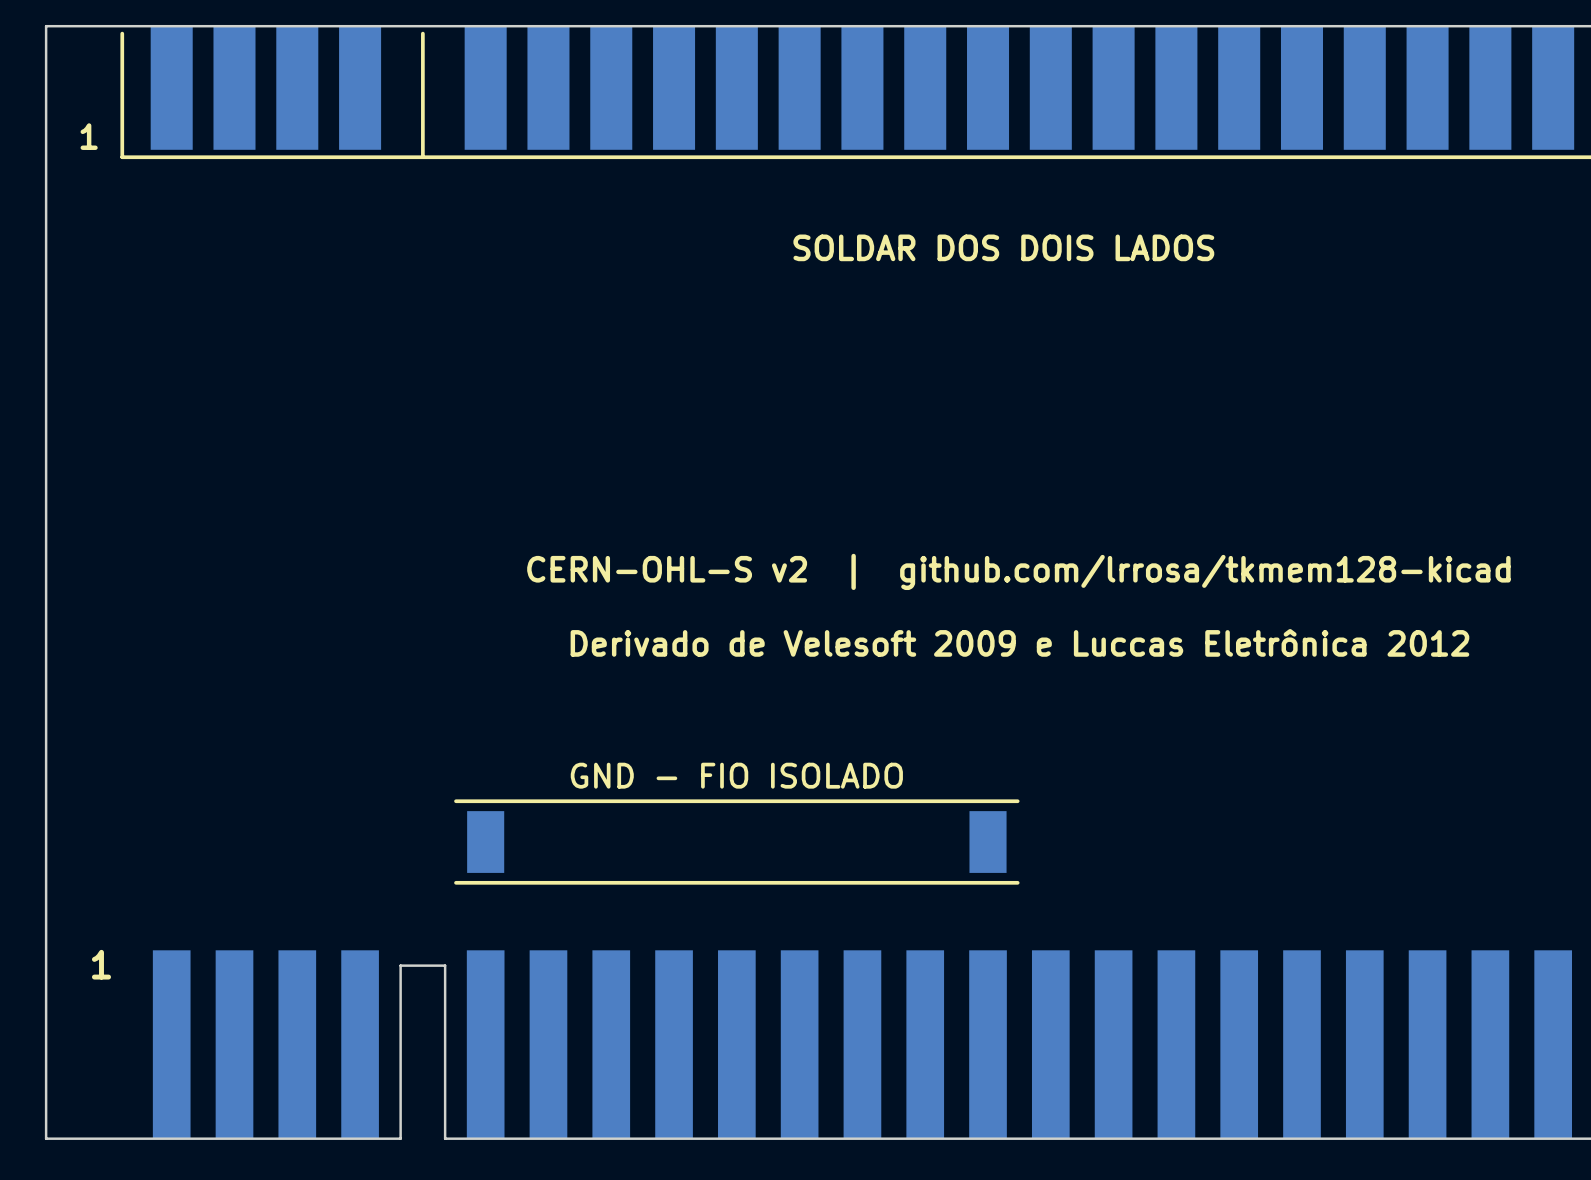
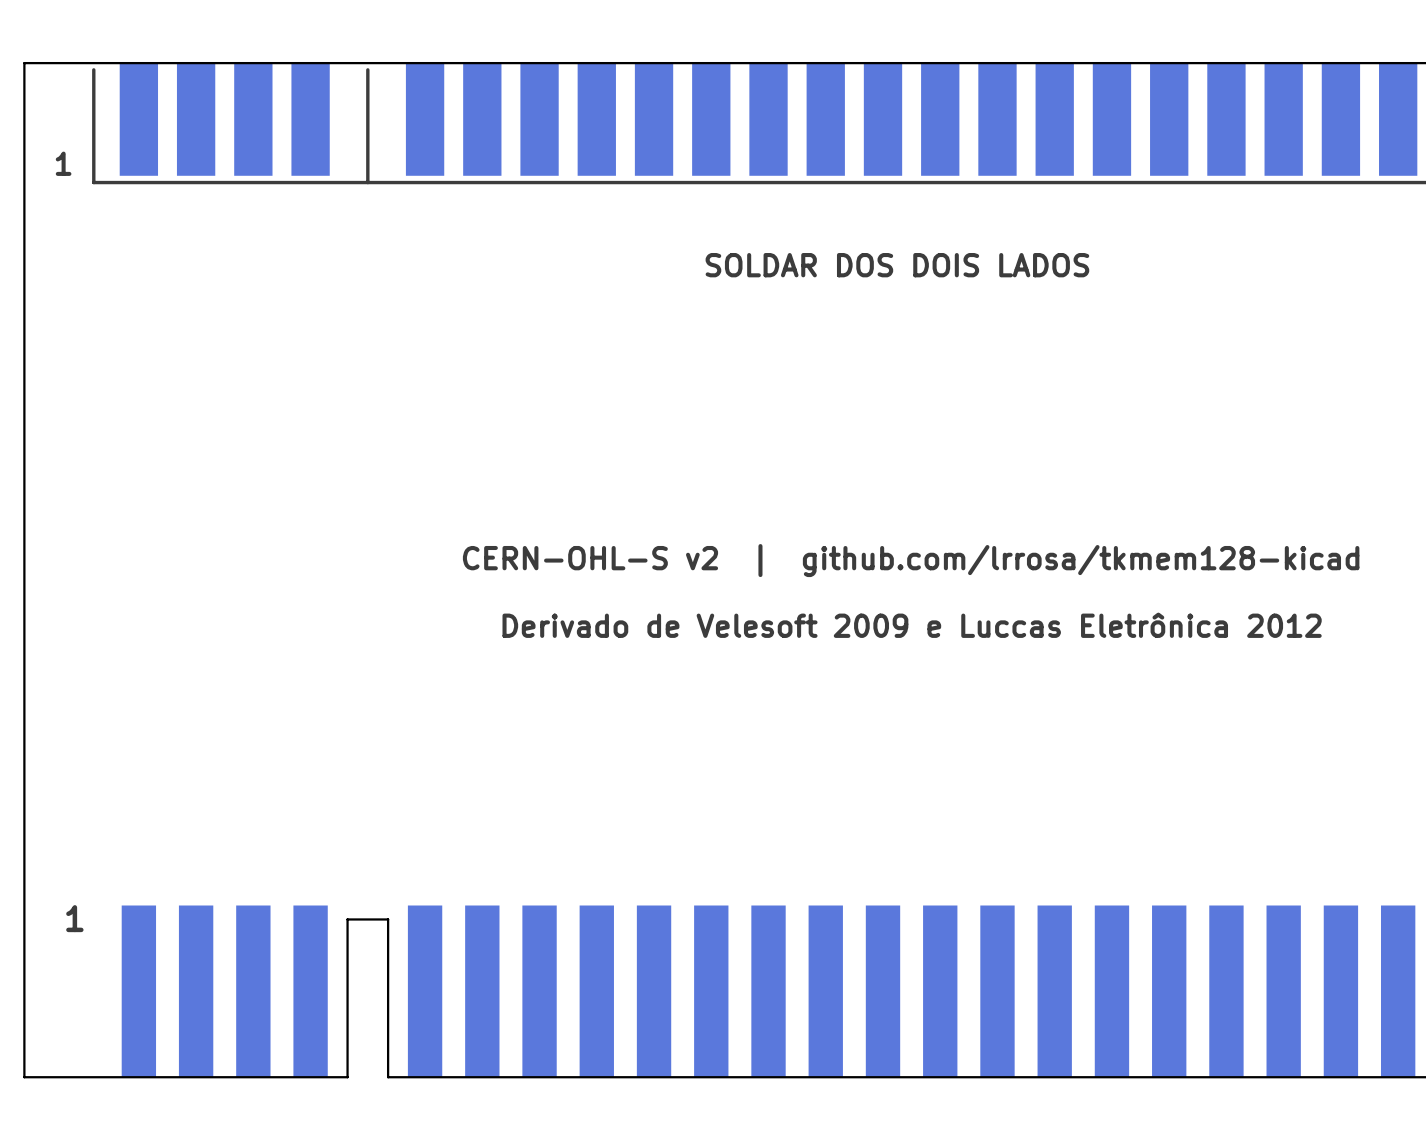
part: (736, 842) -> none

